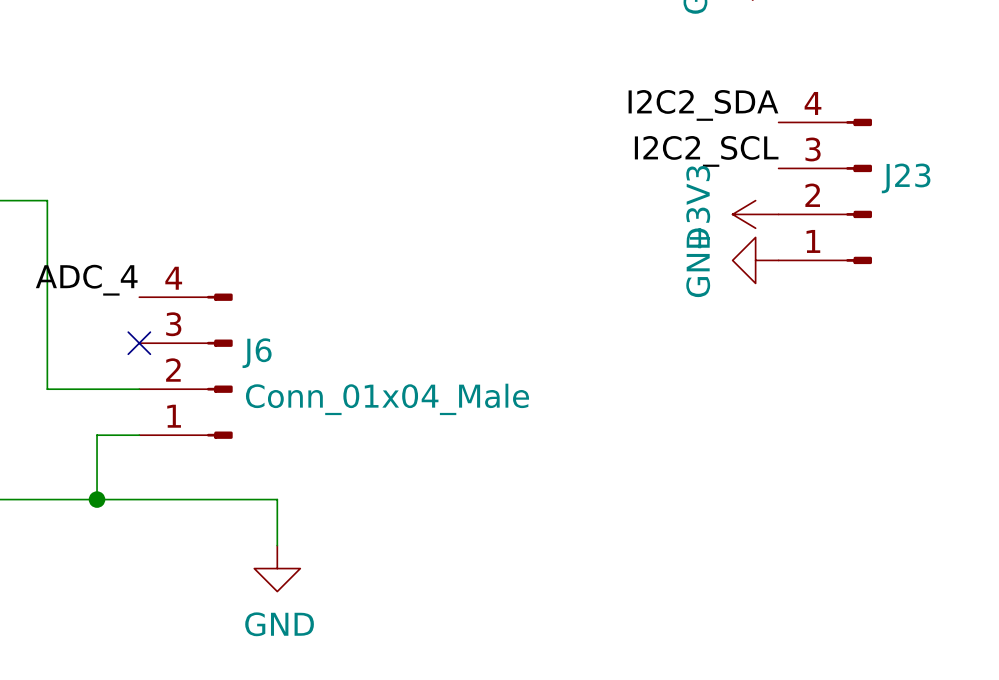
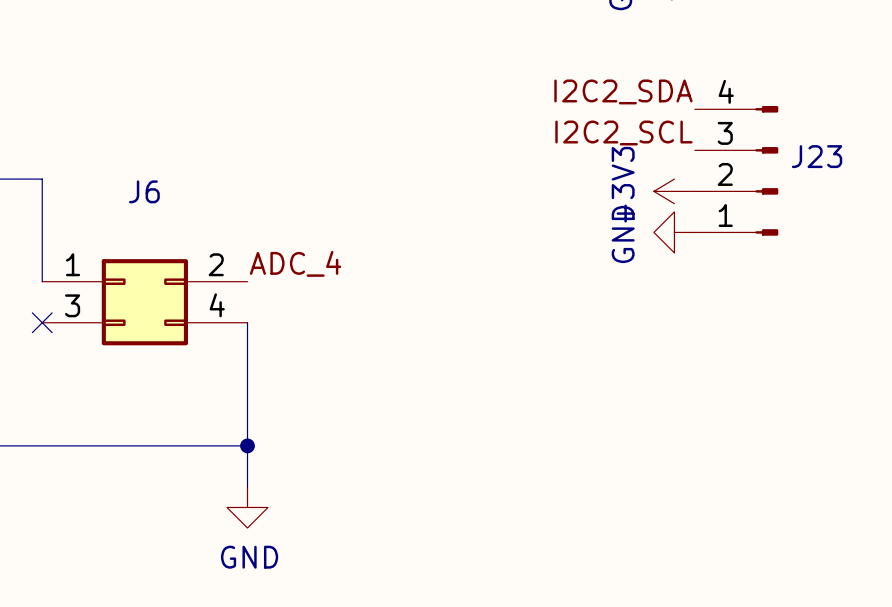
label position: ADC_4 (86, 280) -> ADC_4 (295, 263)
J6 symbol: [139, 293, 233, 439] -> [42, 259, 248, 346]
wire: (47, 315) (47, 389) (139, 389) -> none
no-connect mark position: (139, 343) -> (42, 322)
J6 name position: J6 (257, 353) -> J6 (144, 191)
wire: none -> (247, 322) (247, 445)
J6 value: Conn_01x04_Male (387, 399) -> none
wire: (139, 435) (97, 435) (97, 499) -> none
junction: (97, 499) -> none
junction: none -> (247, 445)

